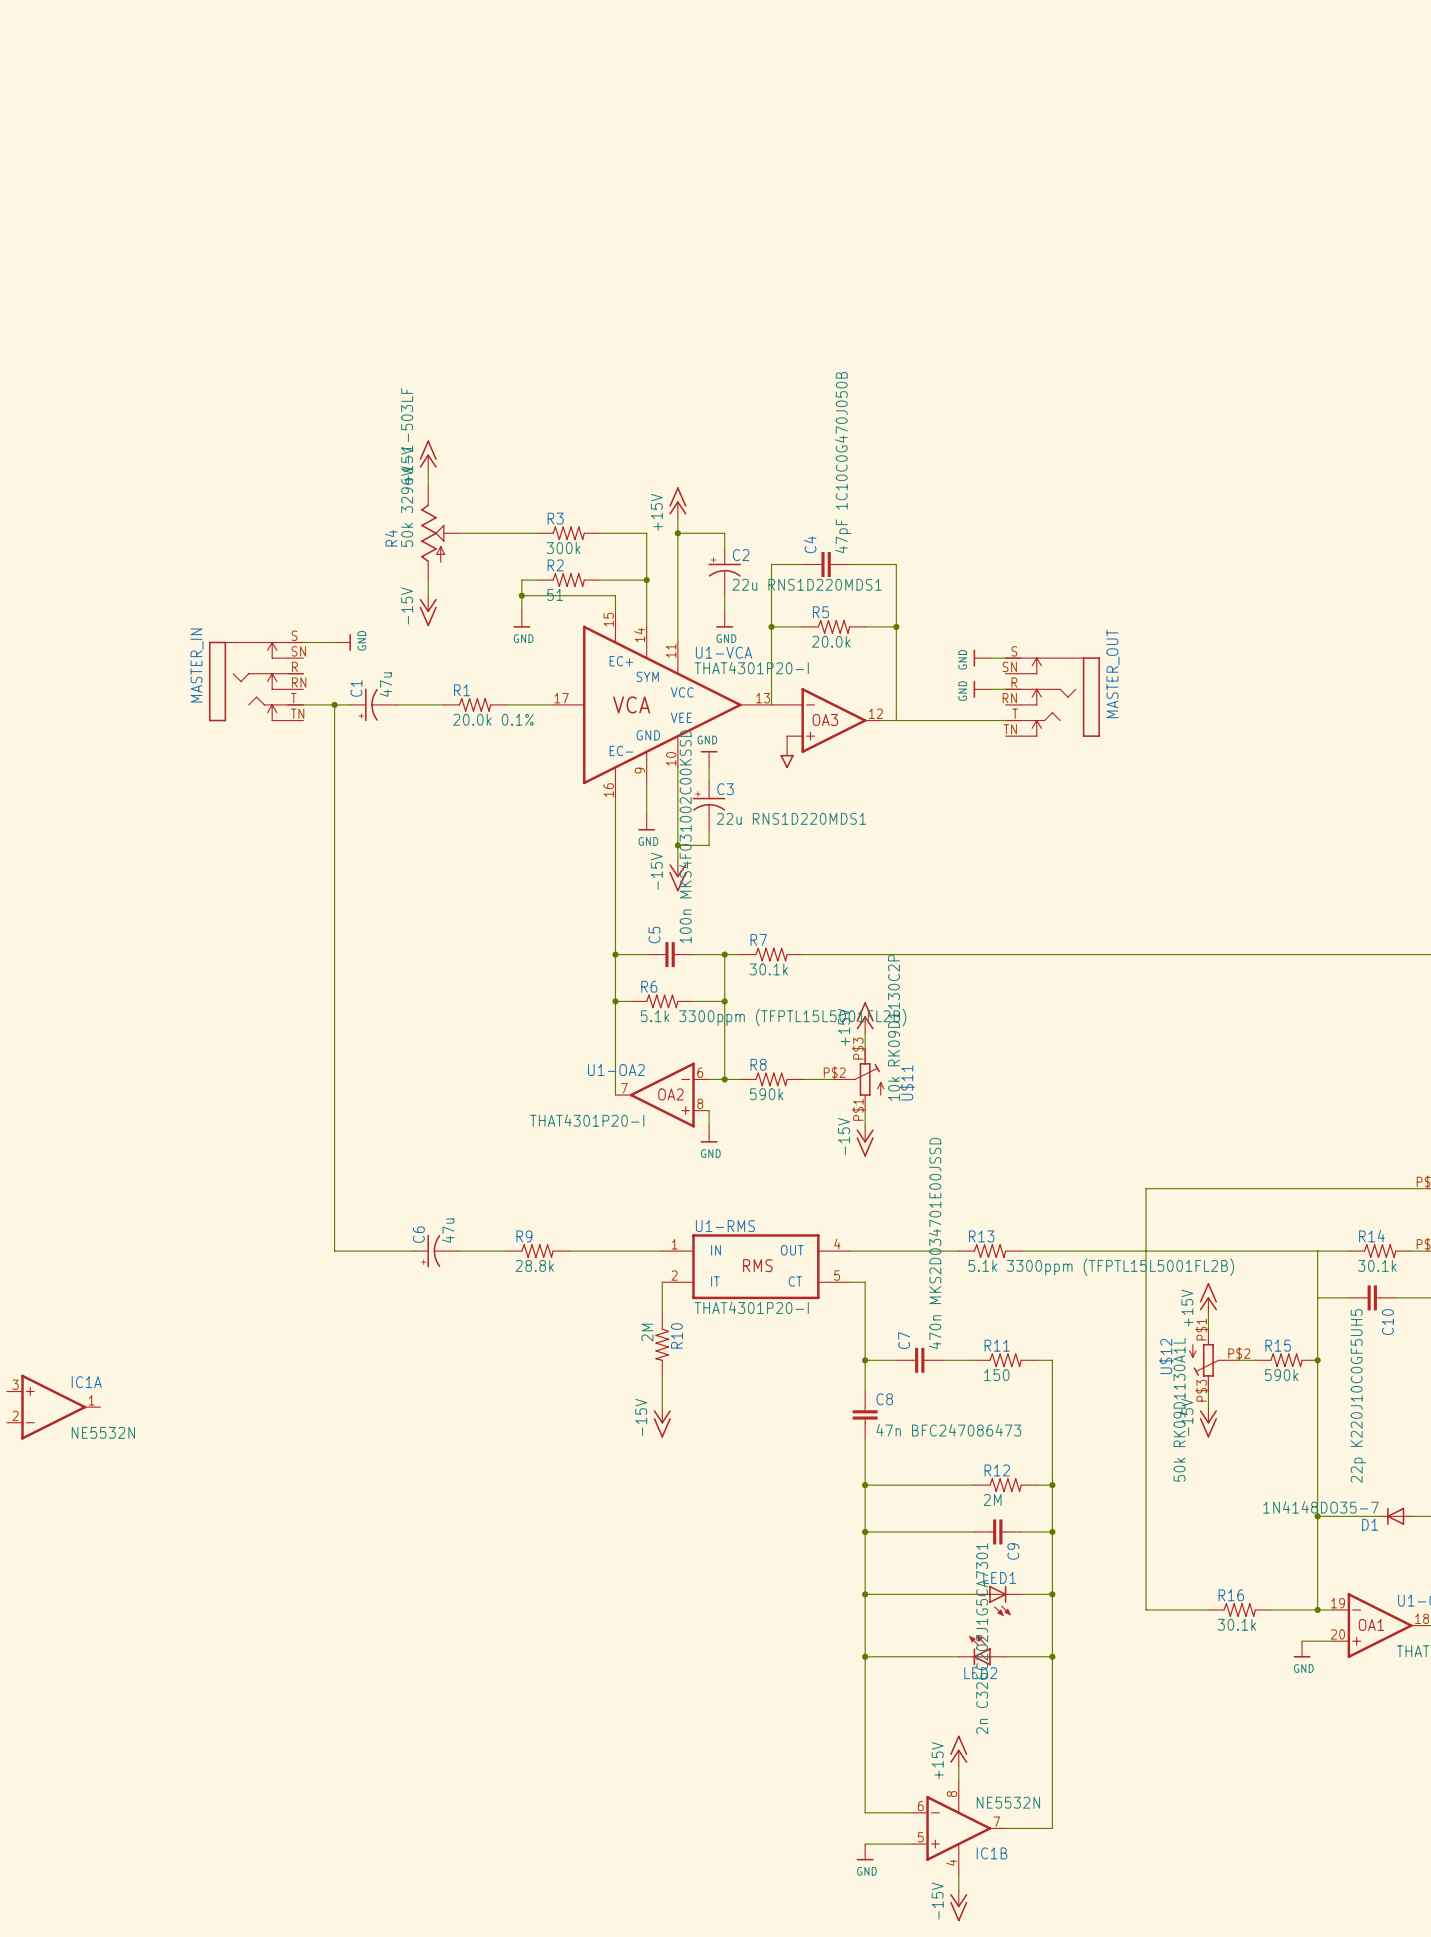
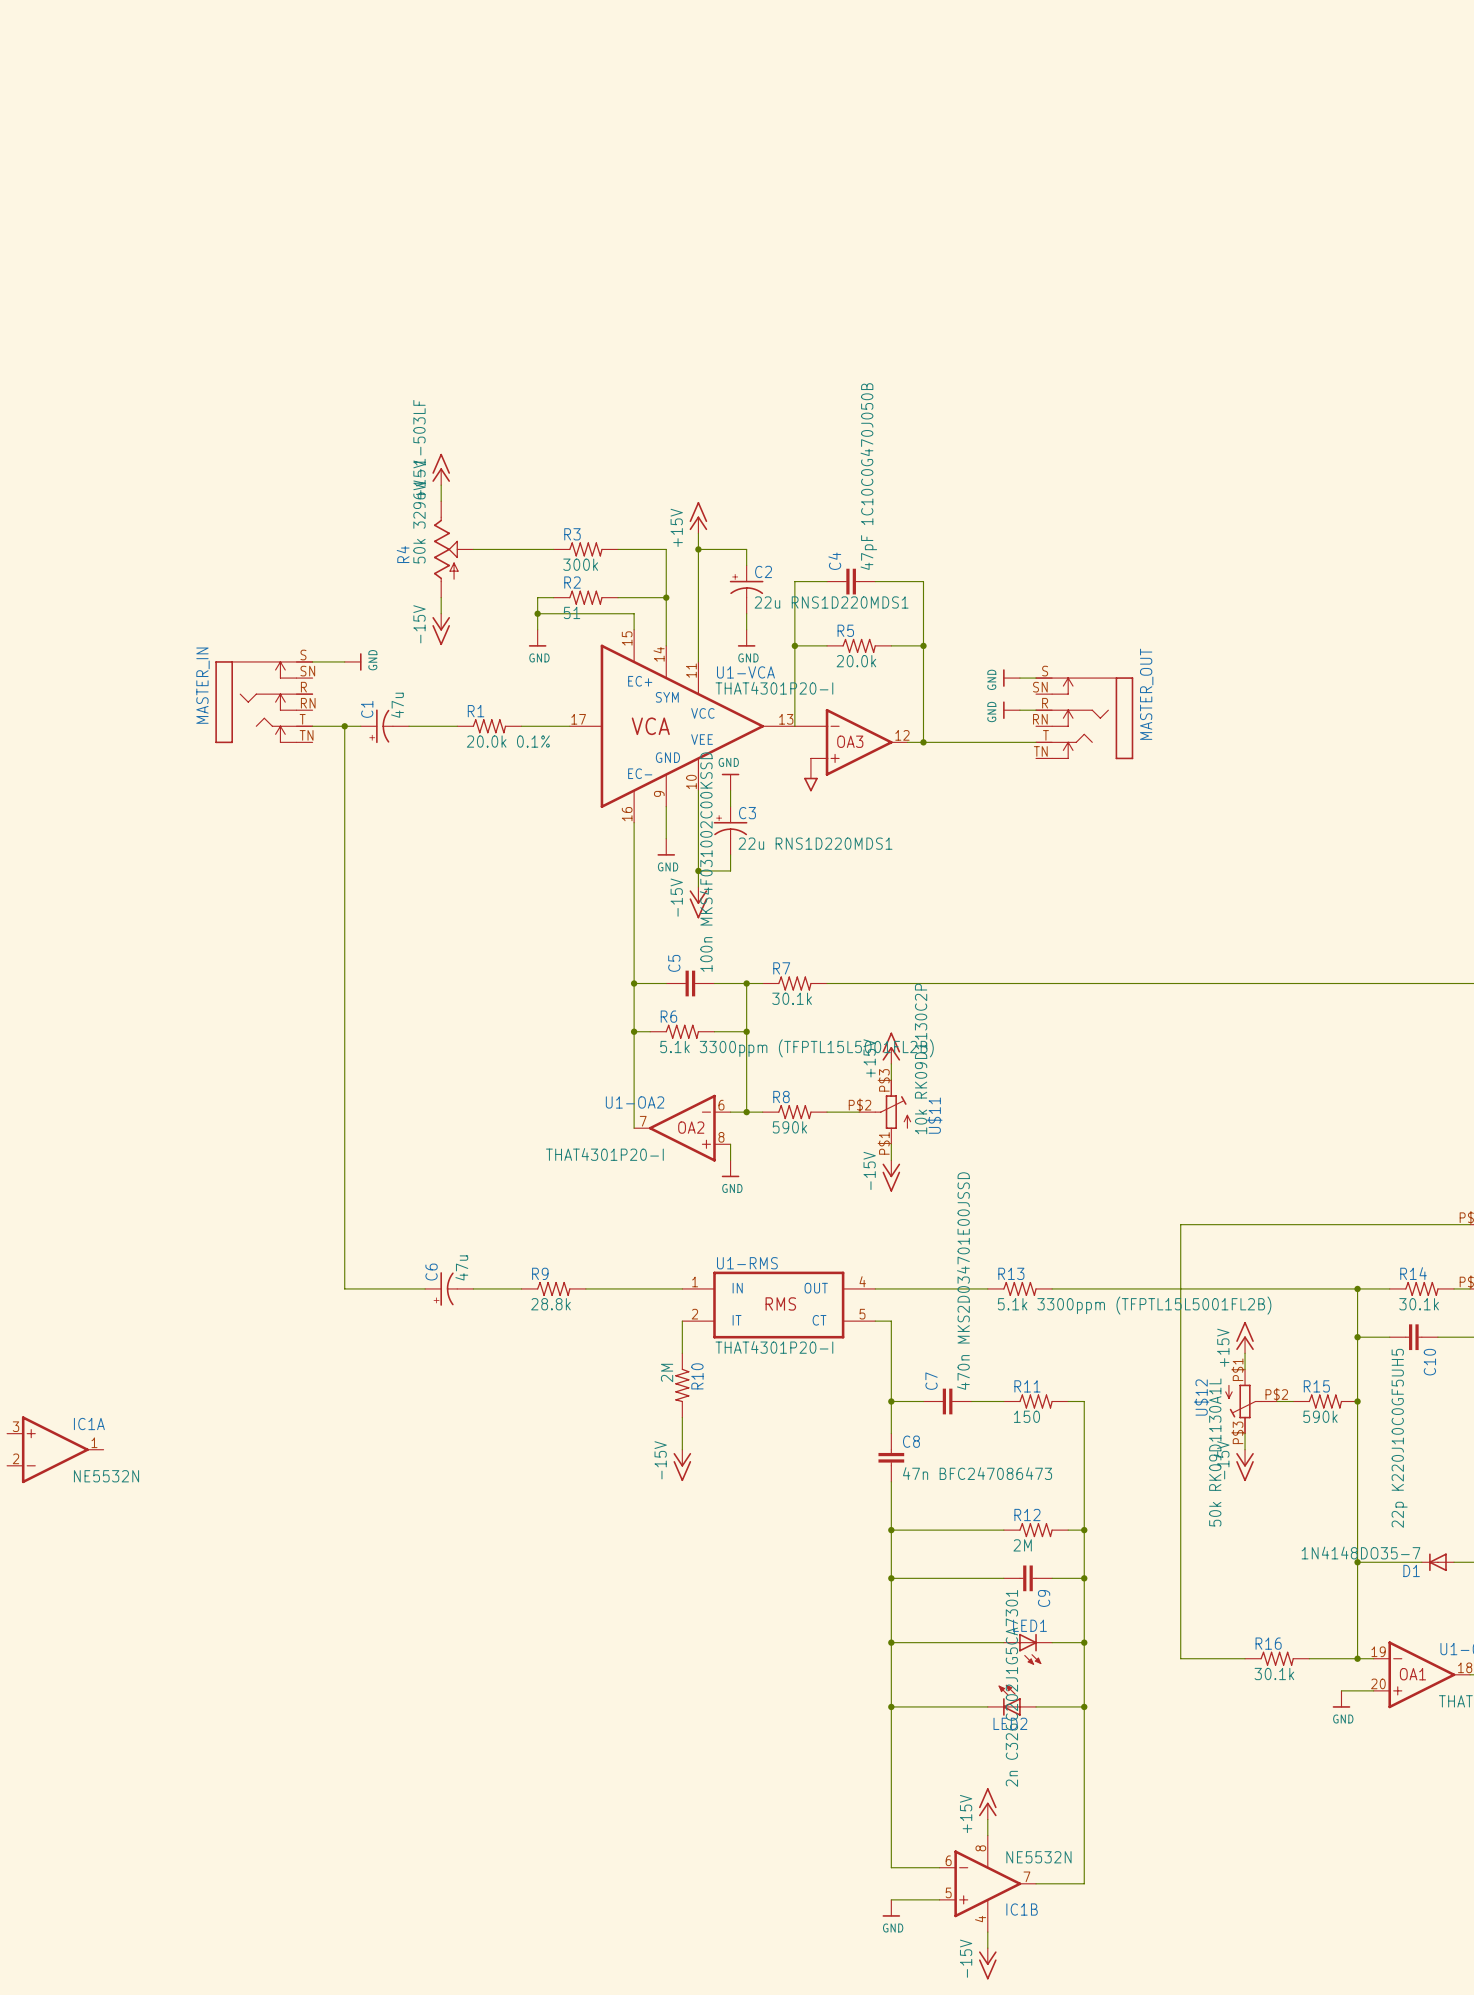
junction: none -> (923, 742)
junction: none -> (1357, 1288)
junction: none -> (1357, 1337)

